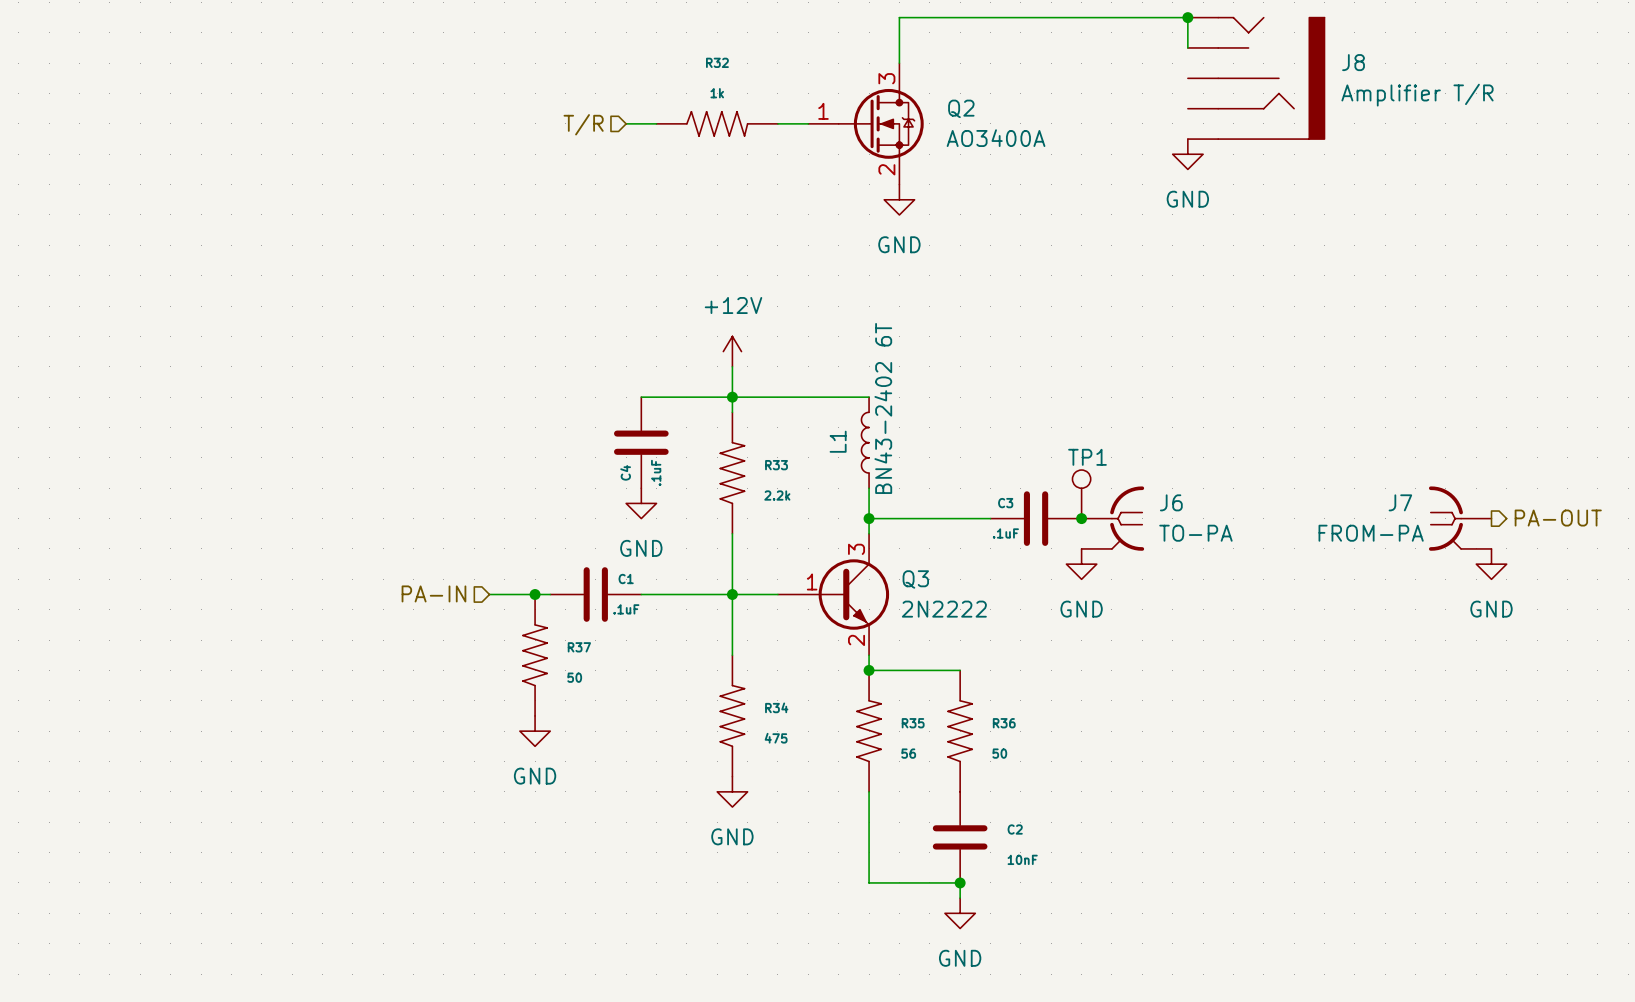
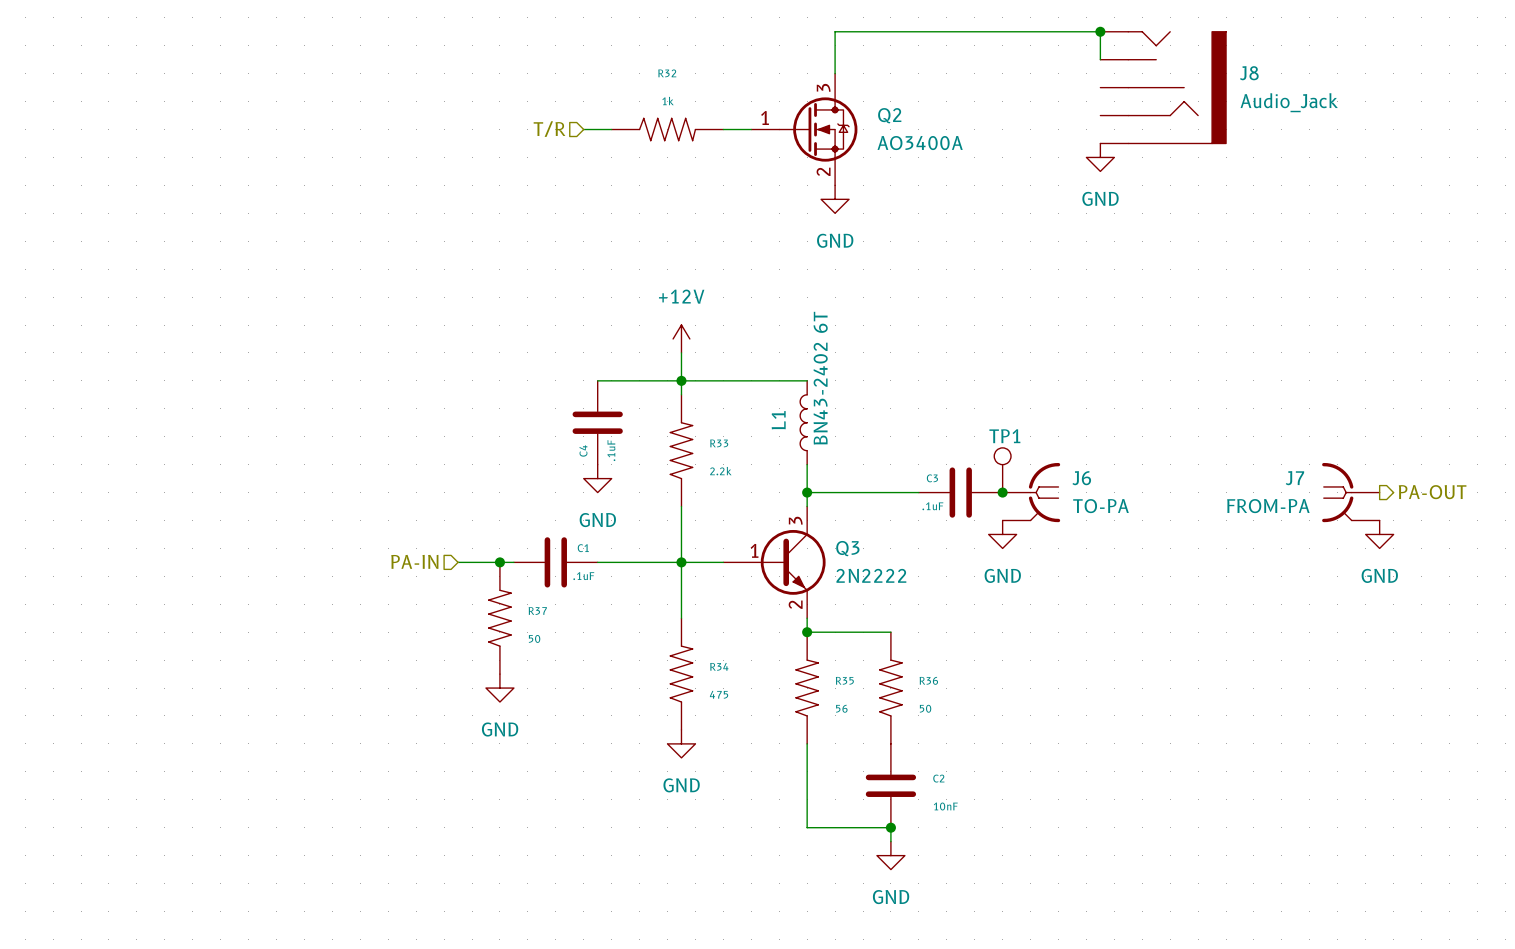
J8 value: Amplifier T/R (1417, 95) -> Audio_Jack (1289, 102)

